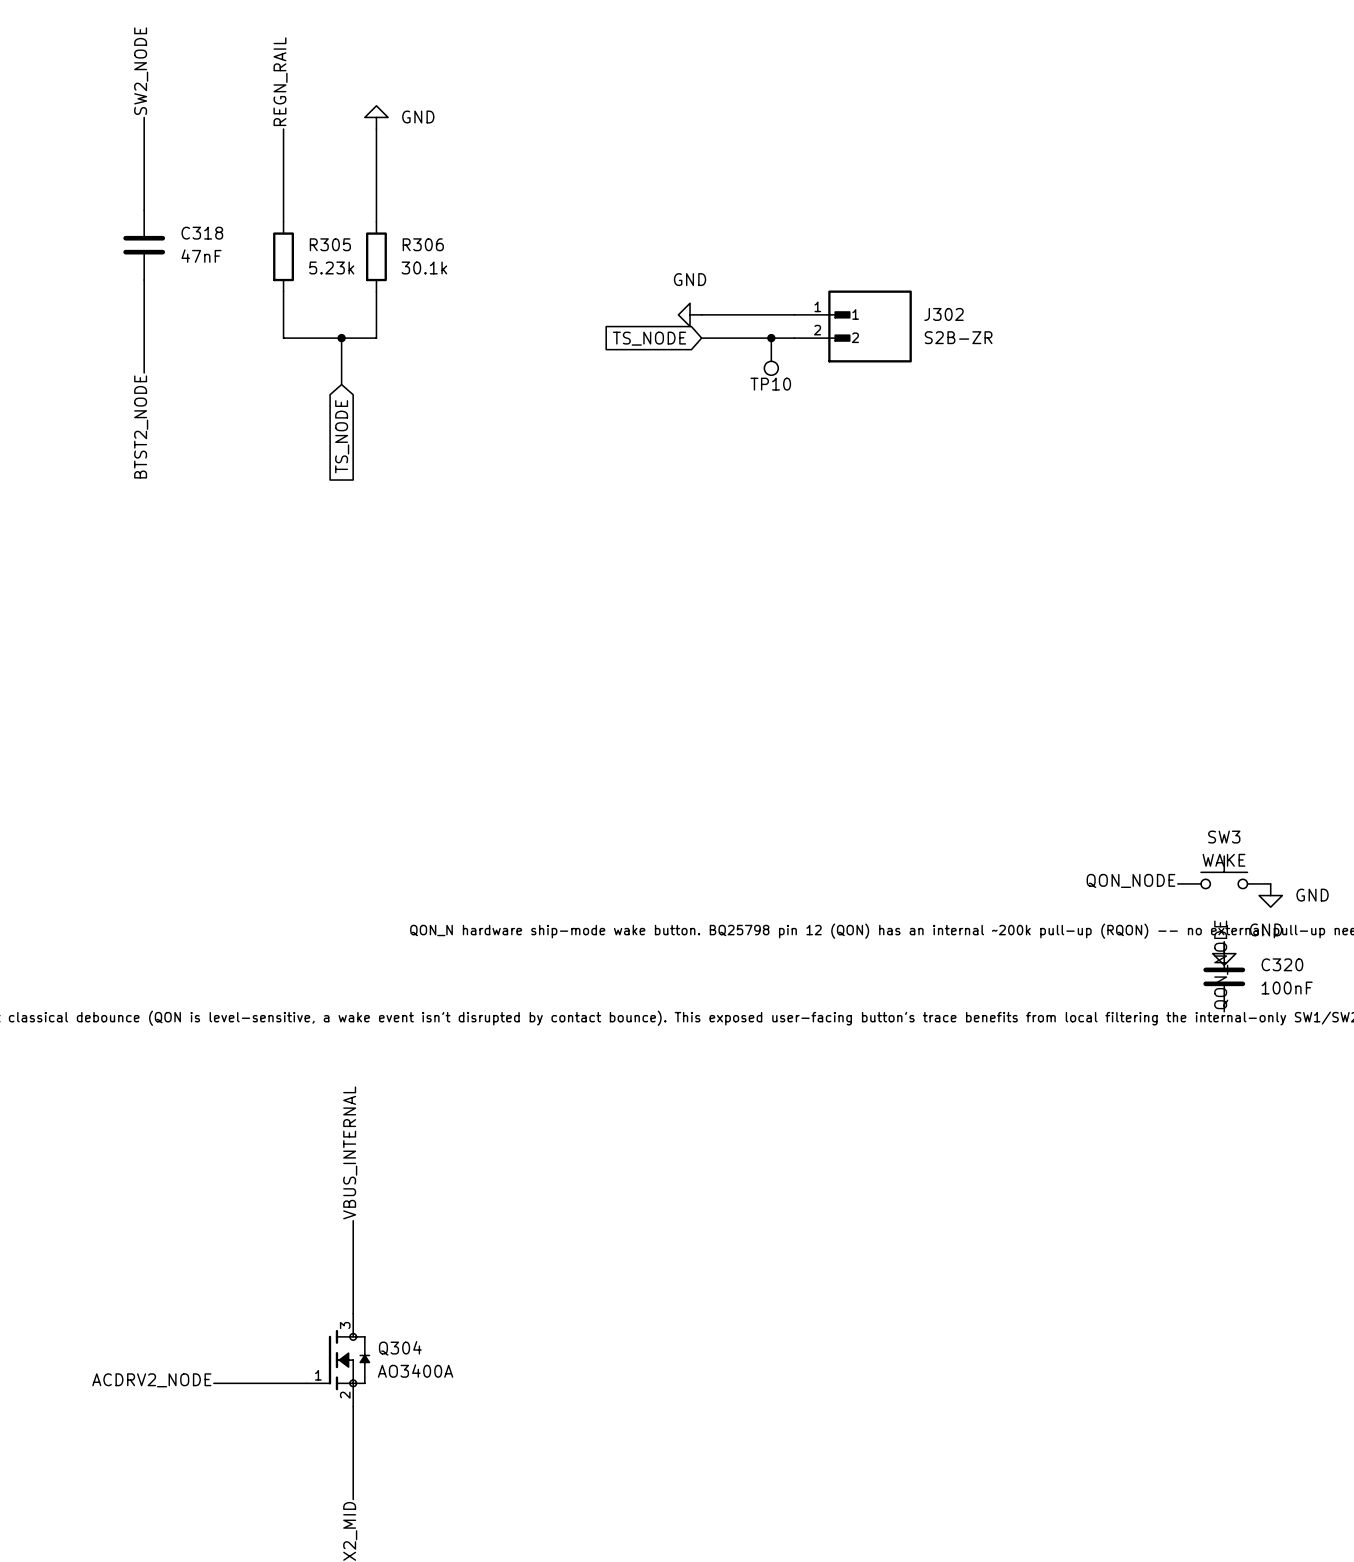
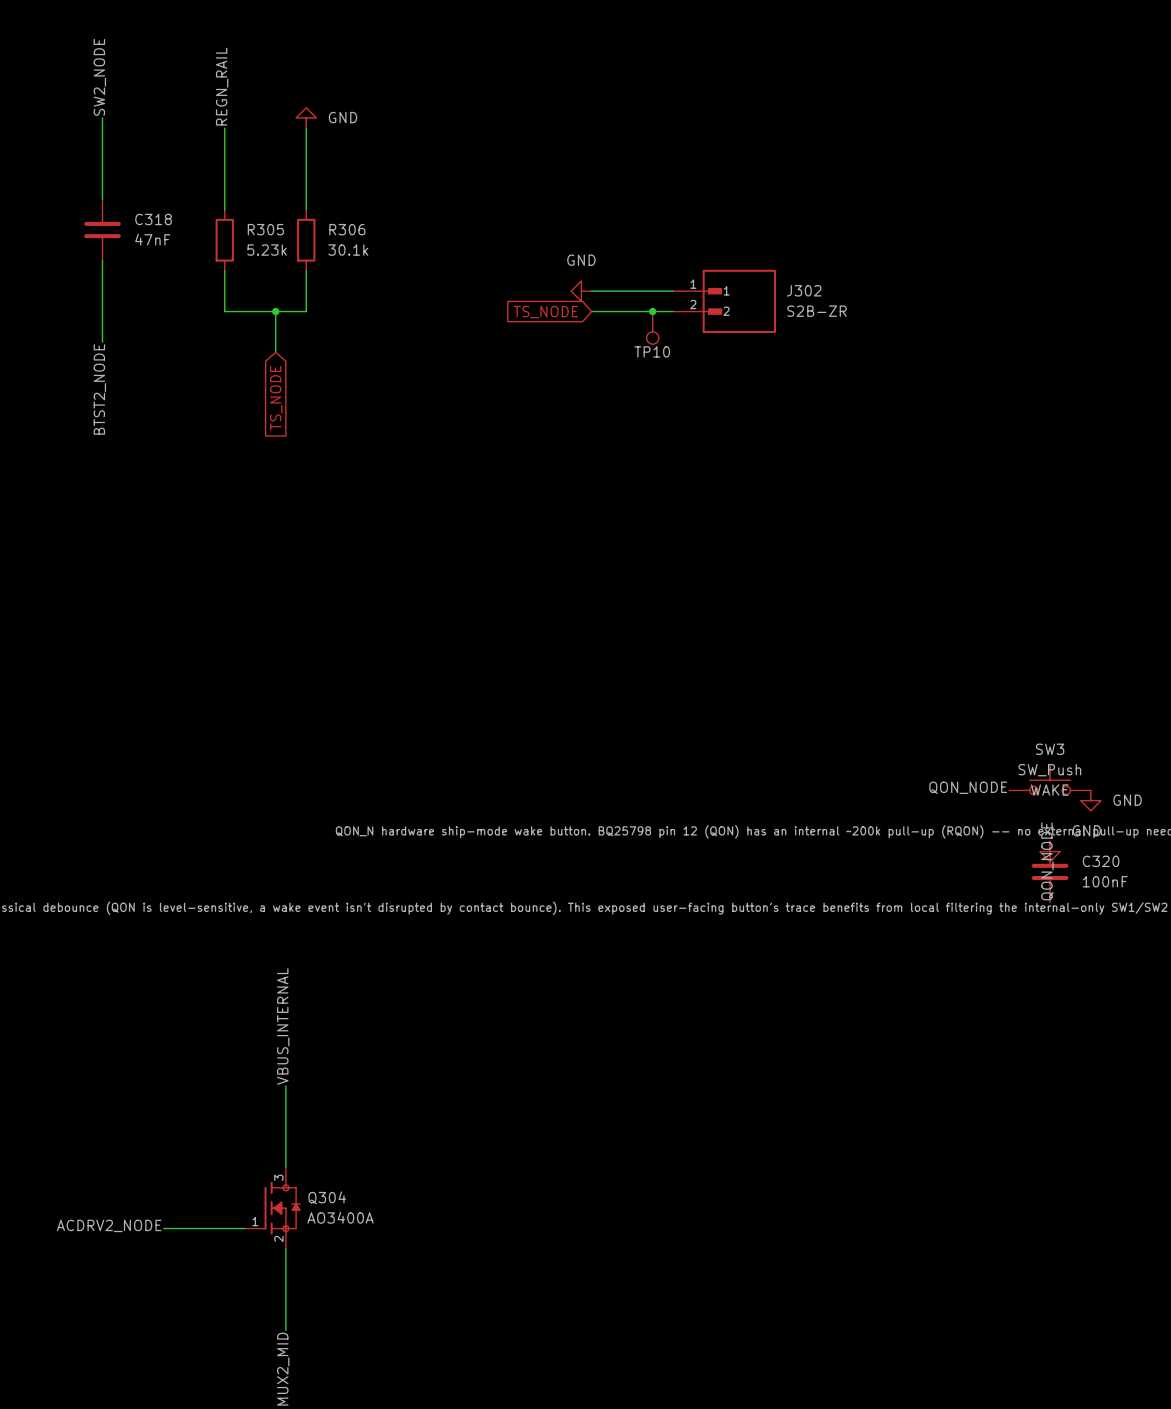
SW3 value: WAKE (1223, 860) -> SW_Push (1049, 770)
SW3 text: none -> WAKE (1049, 790)

